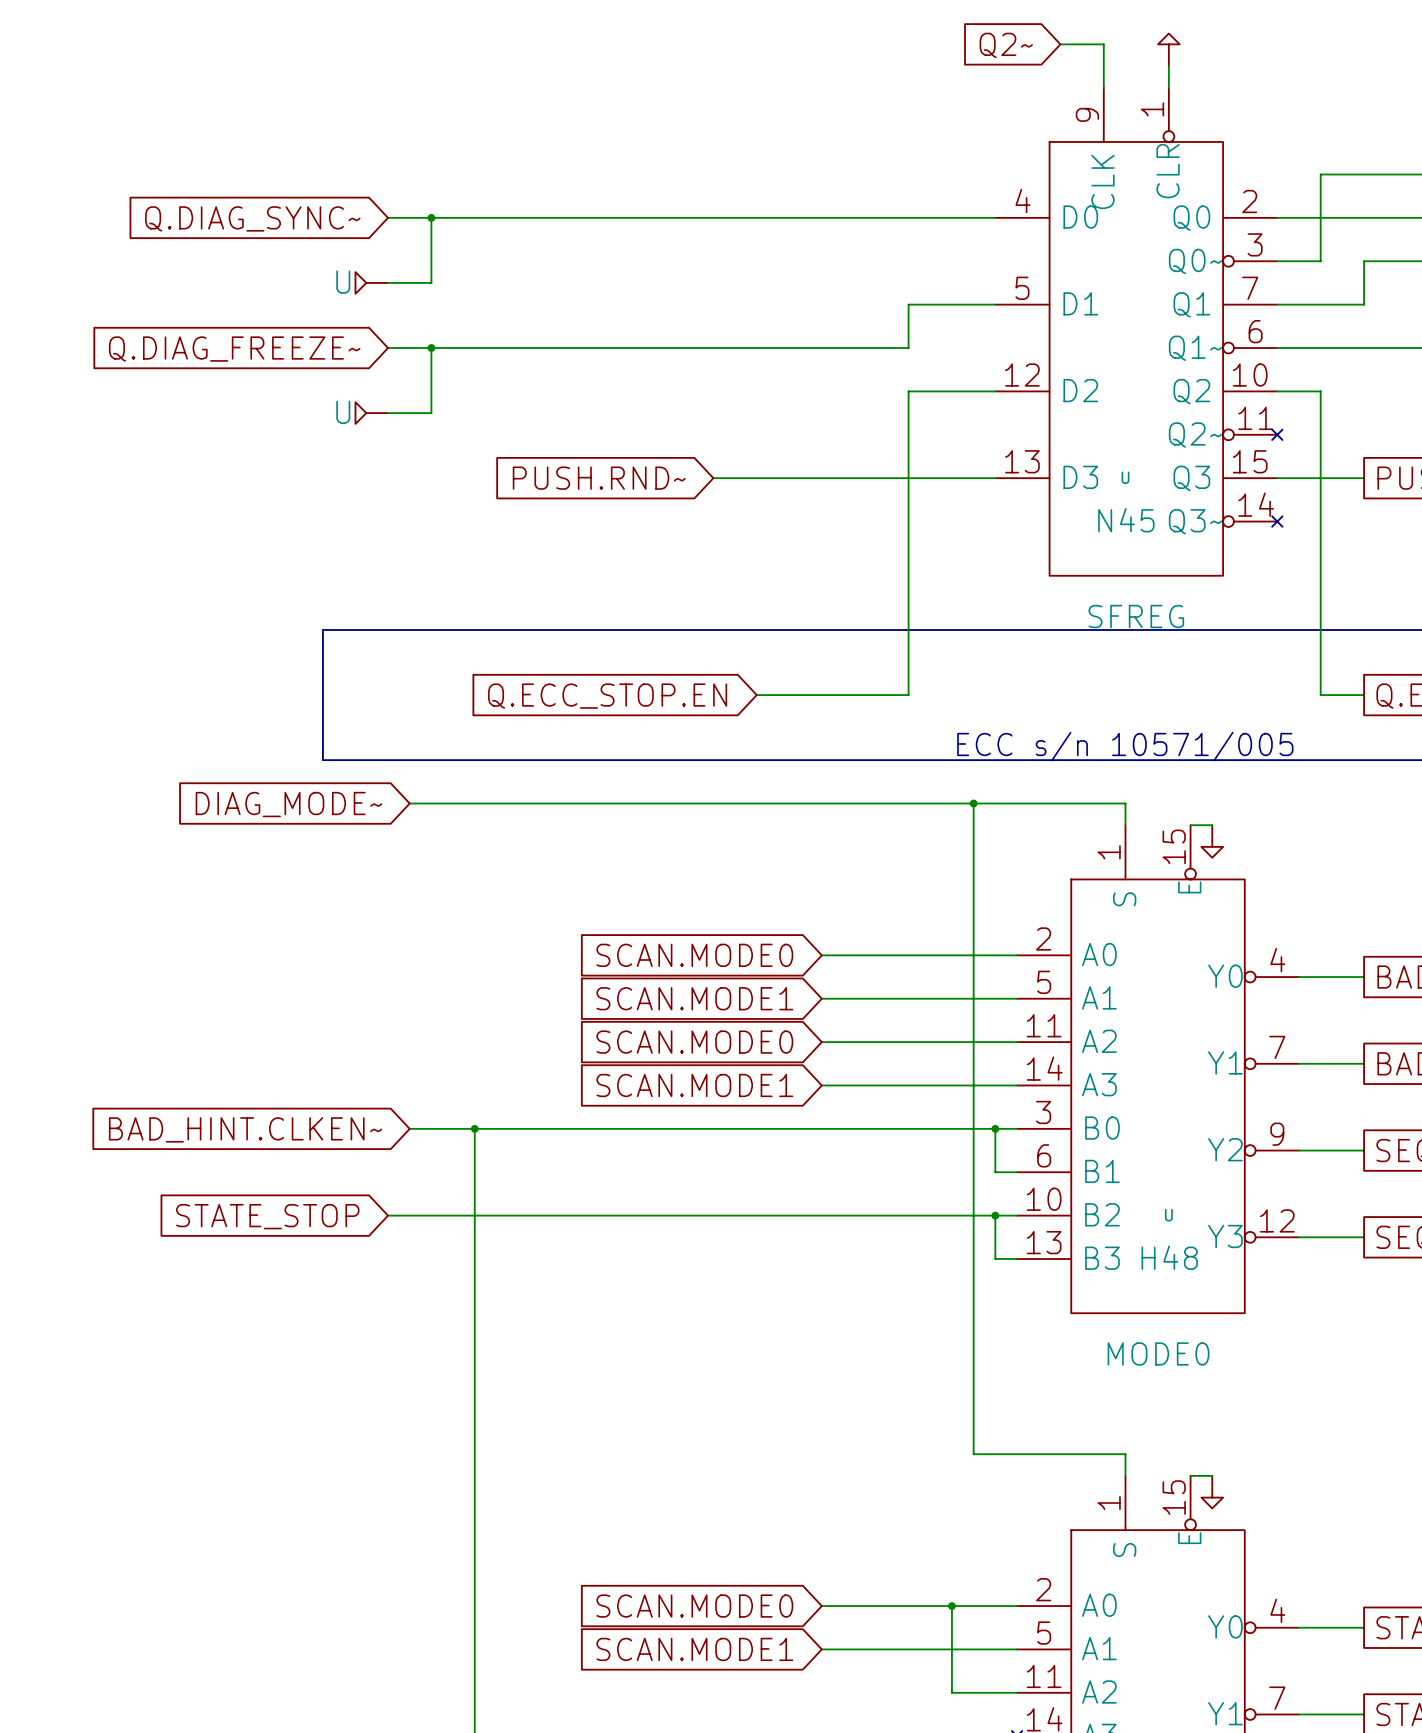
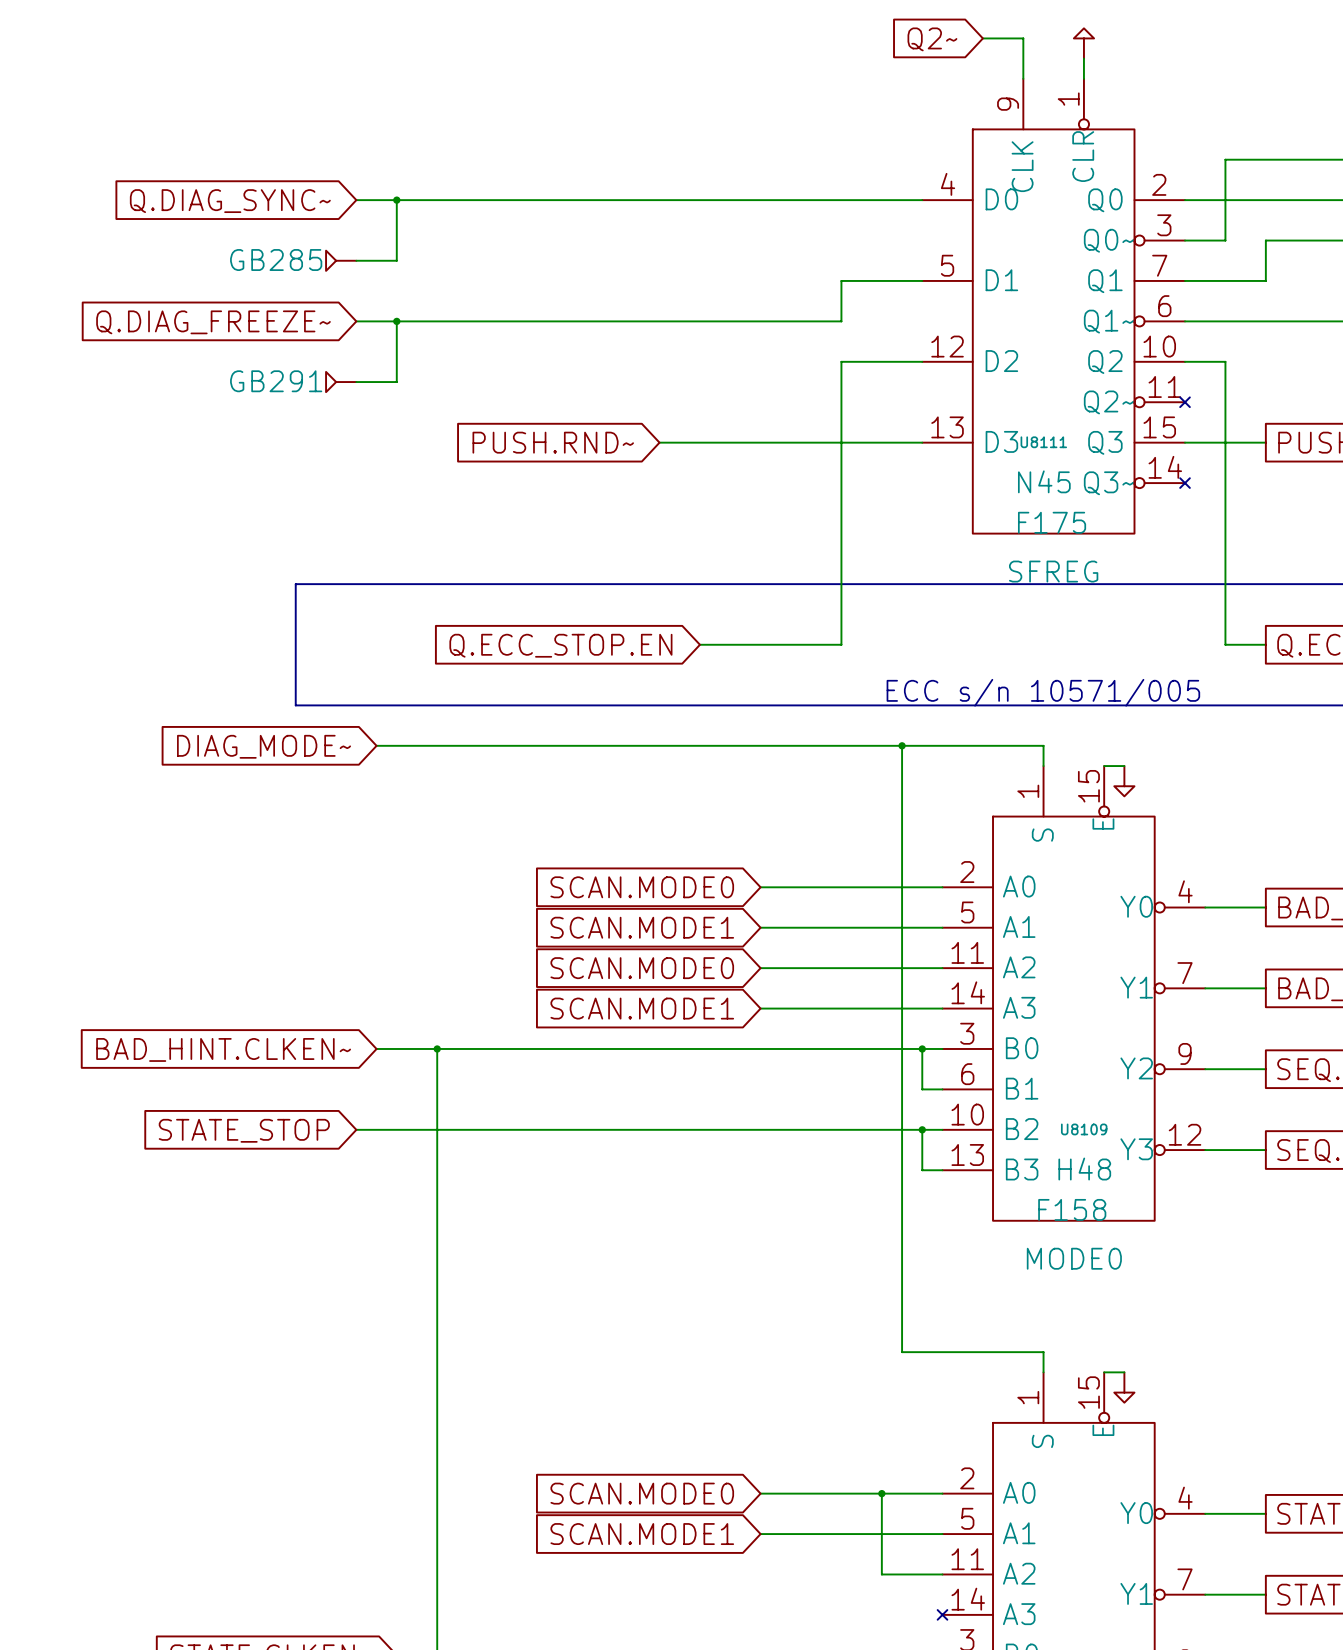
U name: U (343, 282) -> GB285 (276, 260)
U name: U (343, 412) -> GB291 (276, 381)
U name: U (1125, 477) -> U8111 (1043, 442)
U value: none -> F175 (1052, 522)
U name: U (1168, 1215) -> U8109 (1084, 1129)
U value: none -> F158 (1072, 1209)

